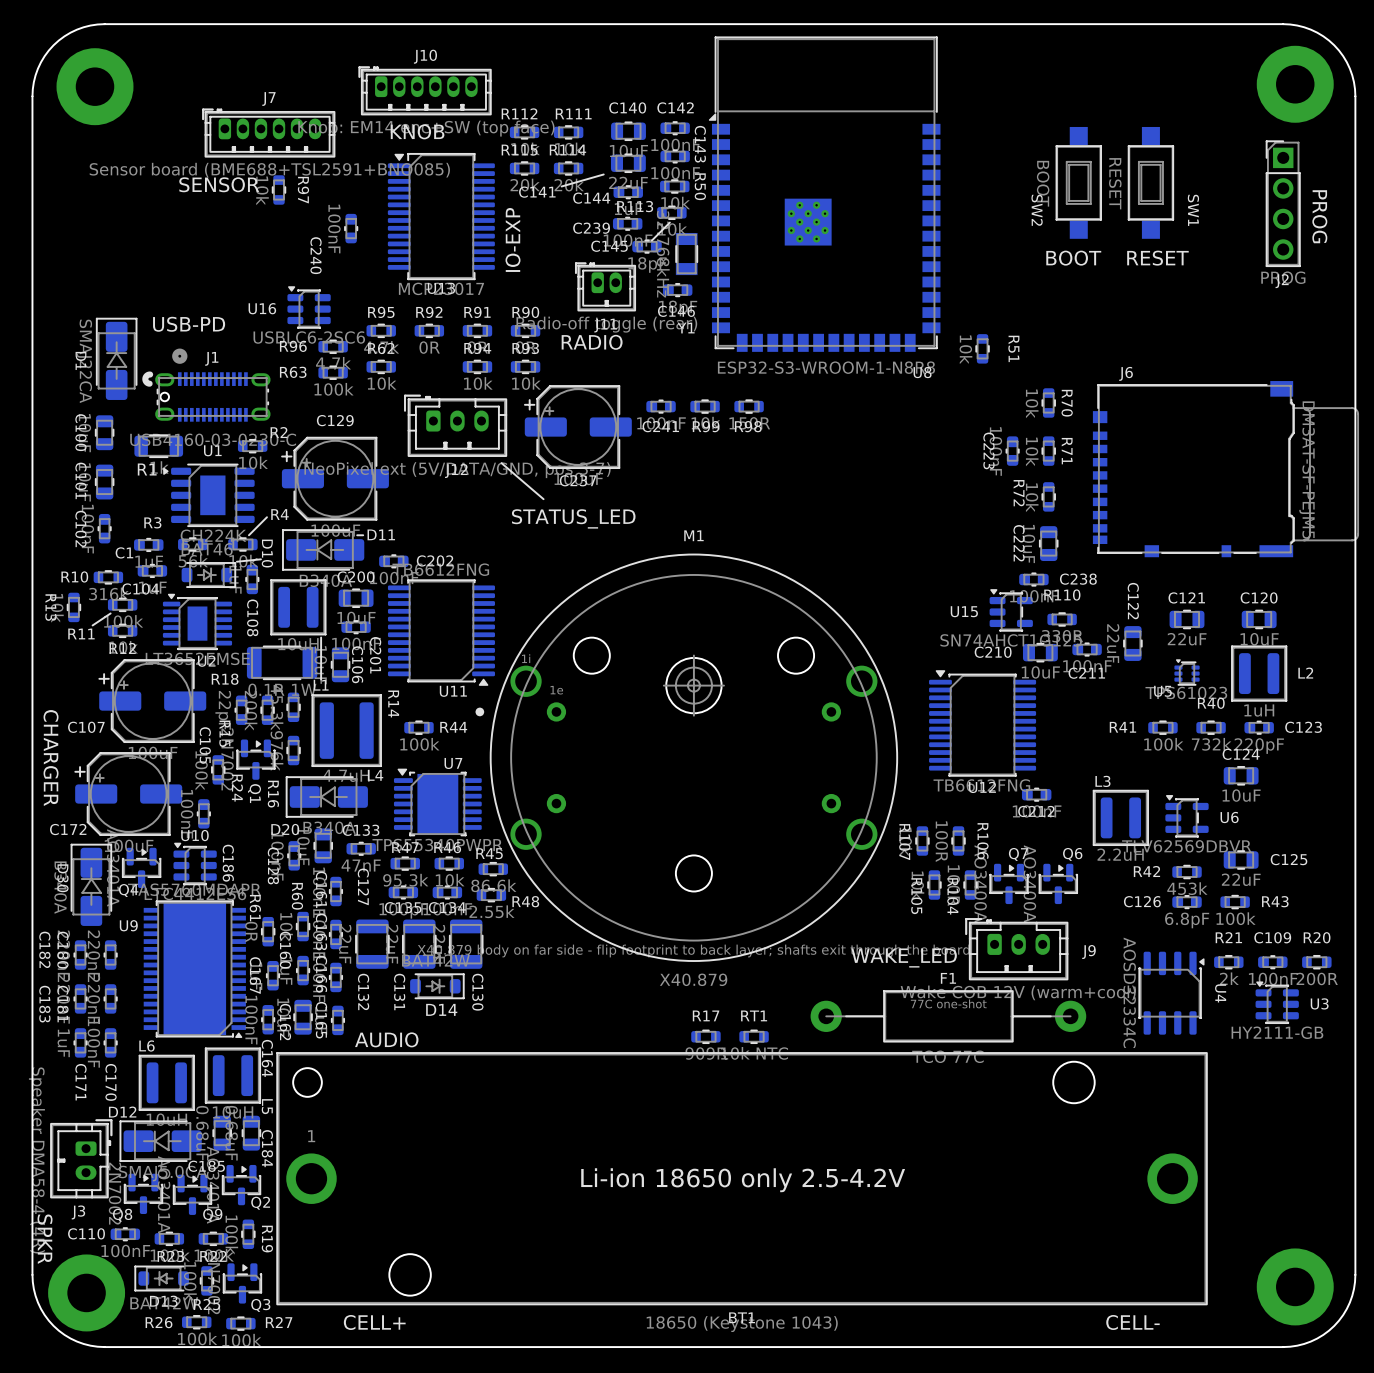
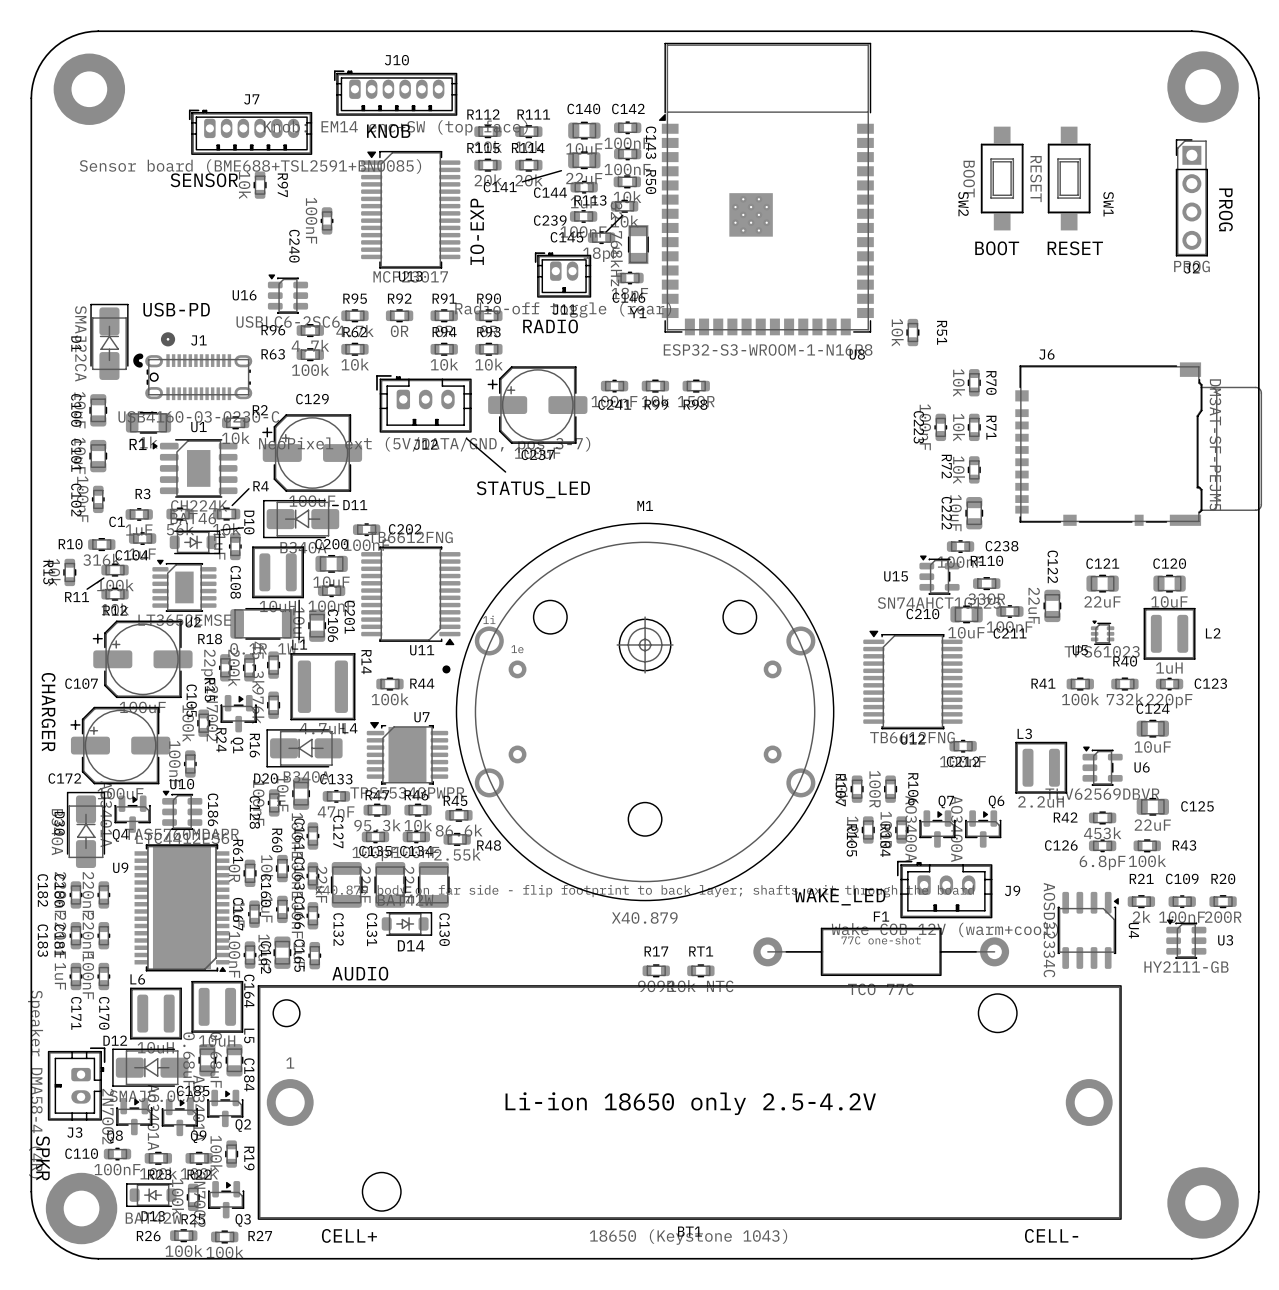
U8 value: ESP32-S3-WROOM-1-N8R8 (826, 367) -> ESP32-S3-WROOM-1-N16R8 (768, 349)

